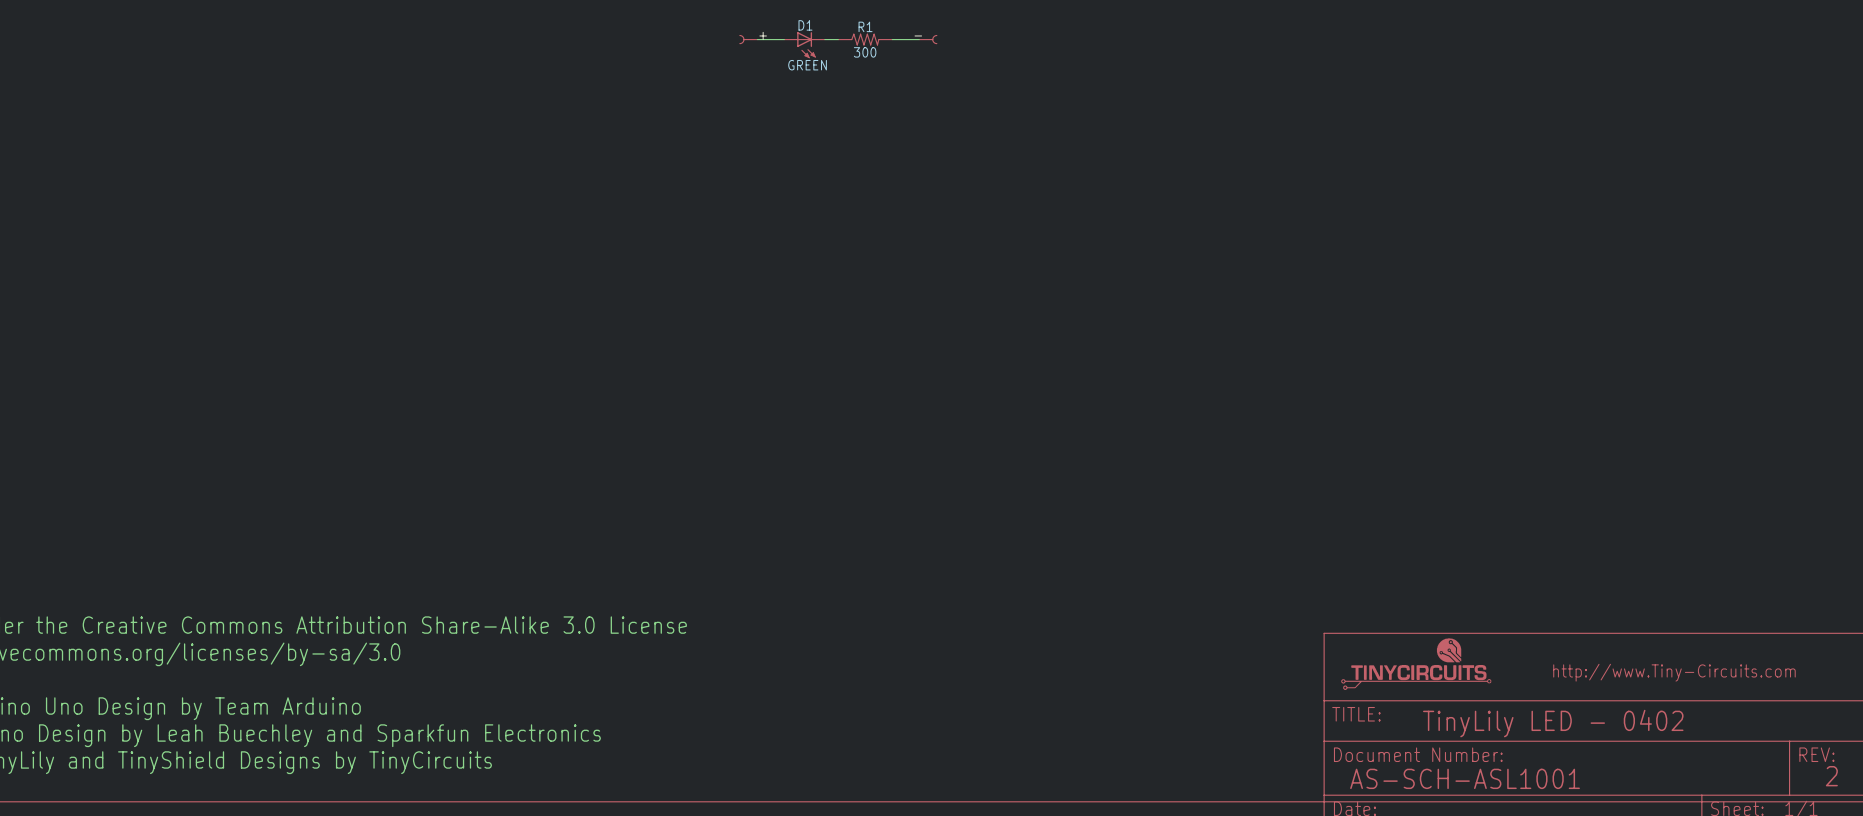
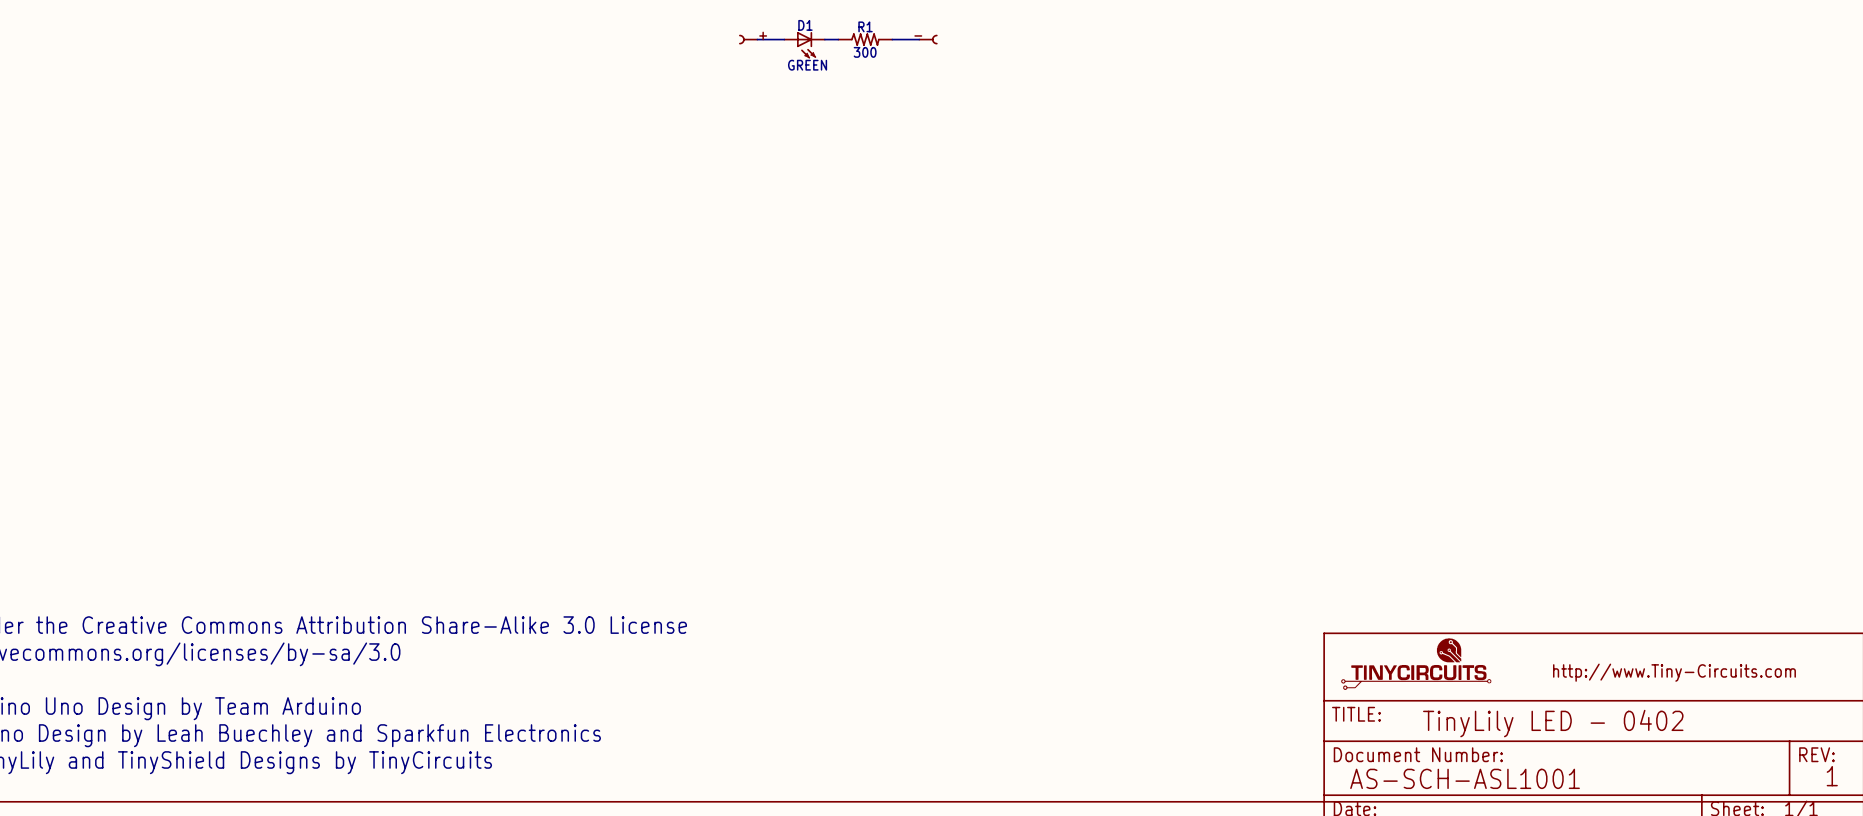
text: 2 (1831, 776) -> 1 (1832, 776)

